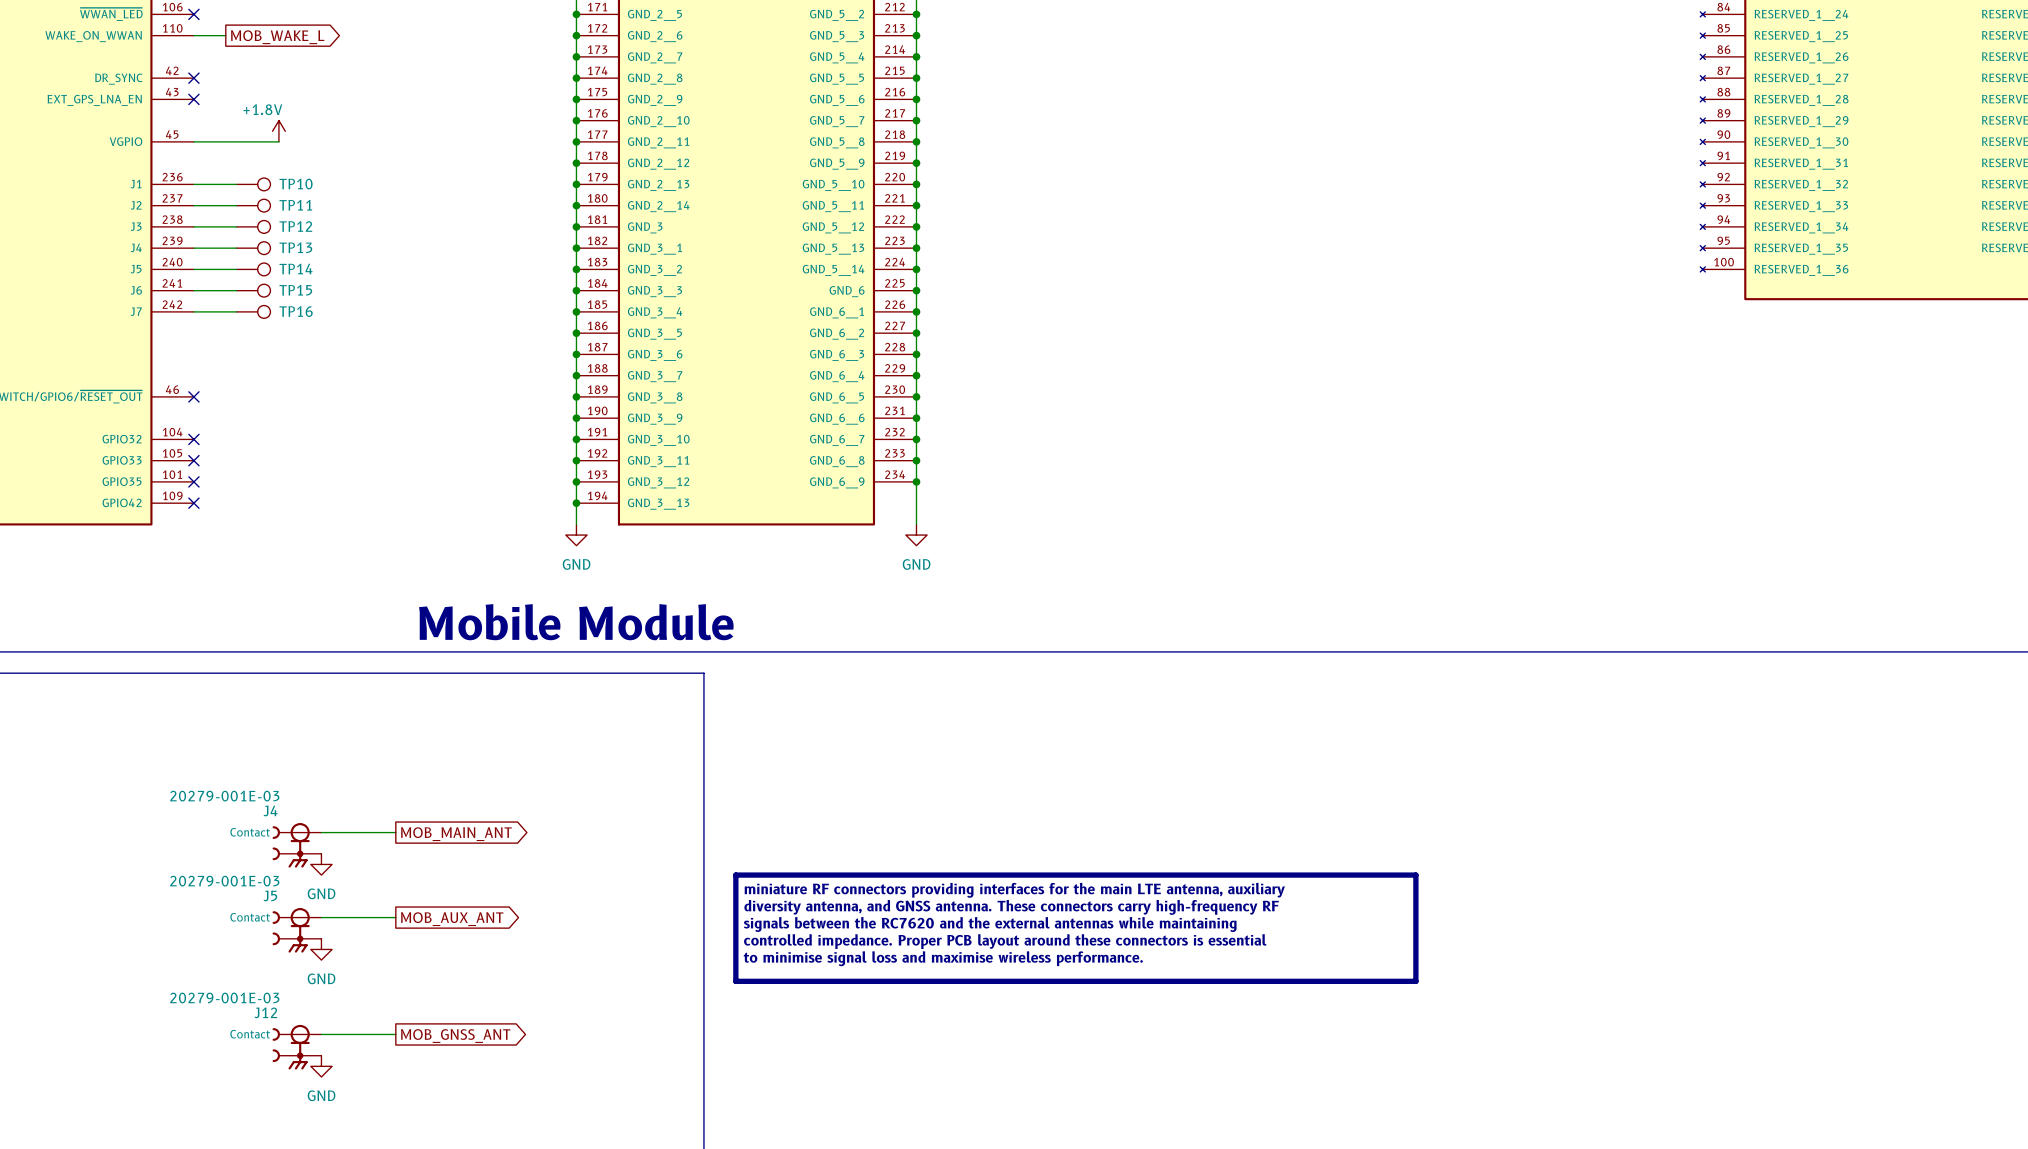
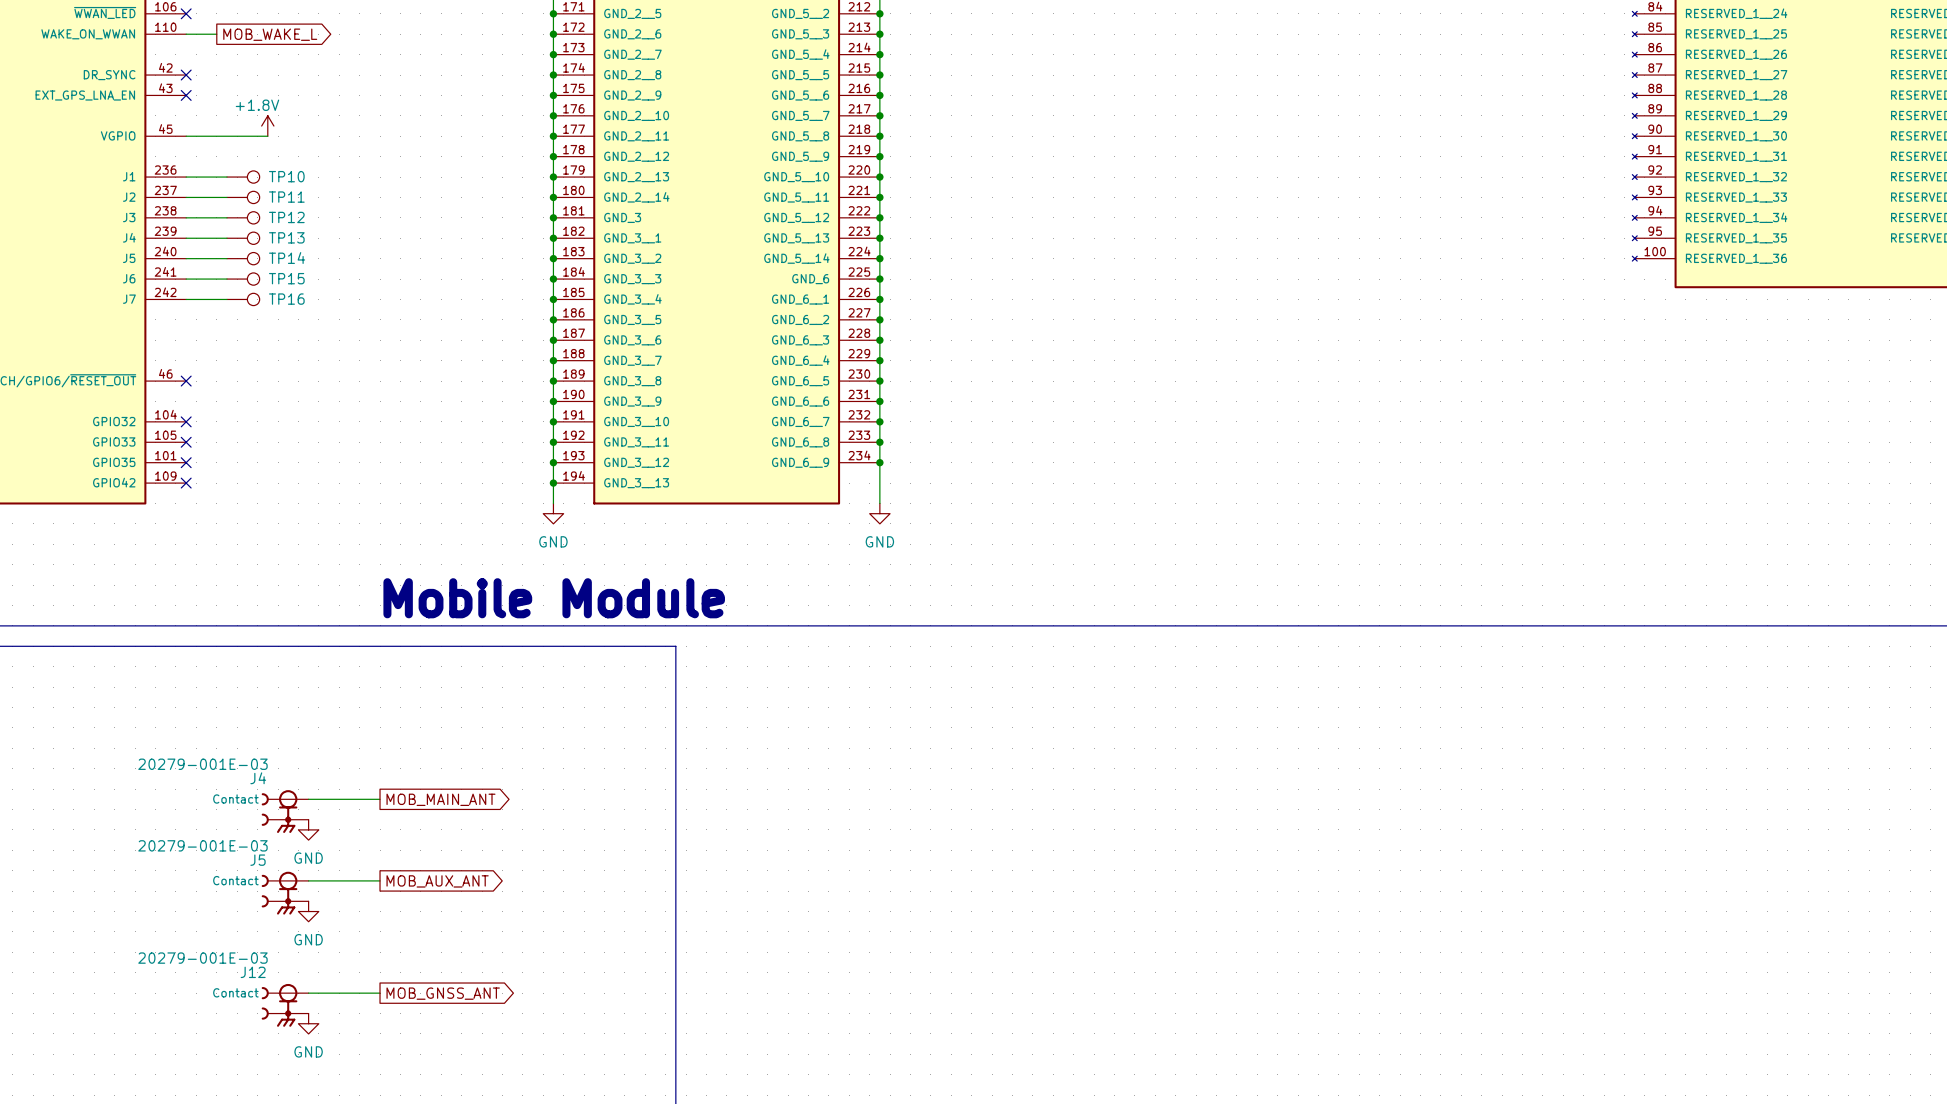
line: (735, 875) (1415, 875) (1415, 981) (735, 981) (735, 875) -> none
text: miniature RF connectors providing interfaces for the main LTE antenna, auxiliary (1014, 890) -> none
text: diversity antenna, and GNSS antenna. These connectors carry high-frequency RF (1011, 907) -> none
text: signals between the RC7620 and the external antennas while maintaining (990, 924) -> none
text: controlled impedance. Proper PCB layout around these connectors is essential (1005, 941) -> none
text: to minimise signal loss and maximise wireless performance. (943, 958) -> none

